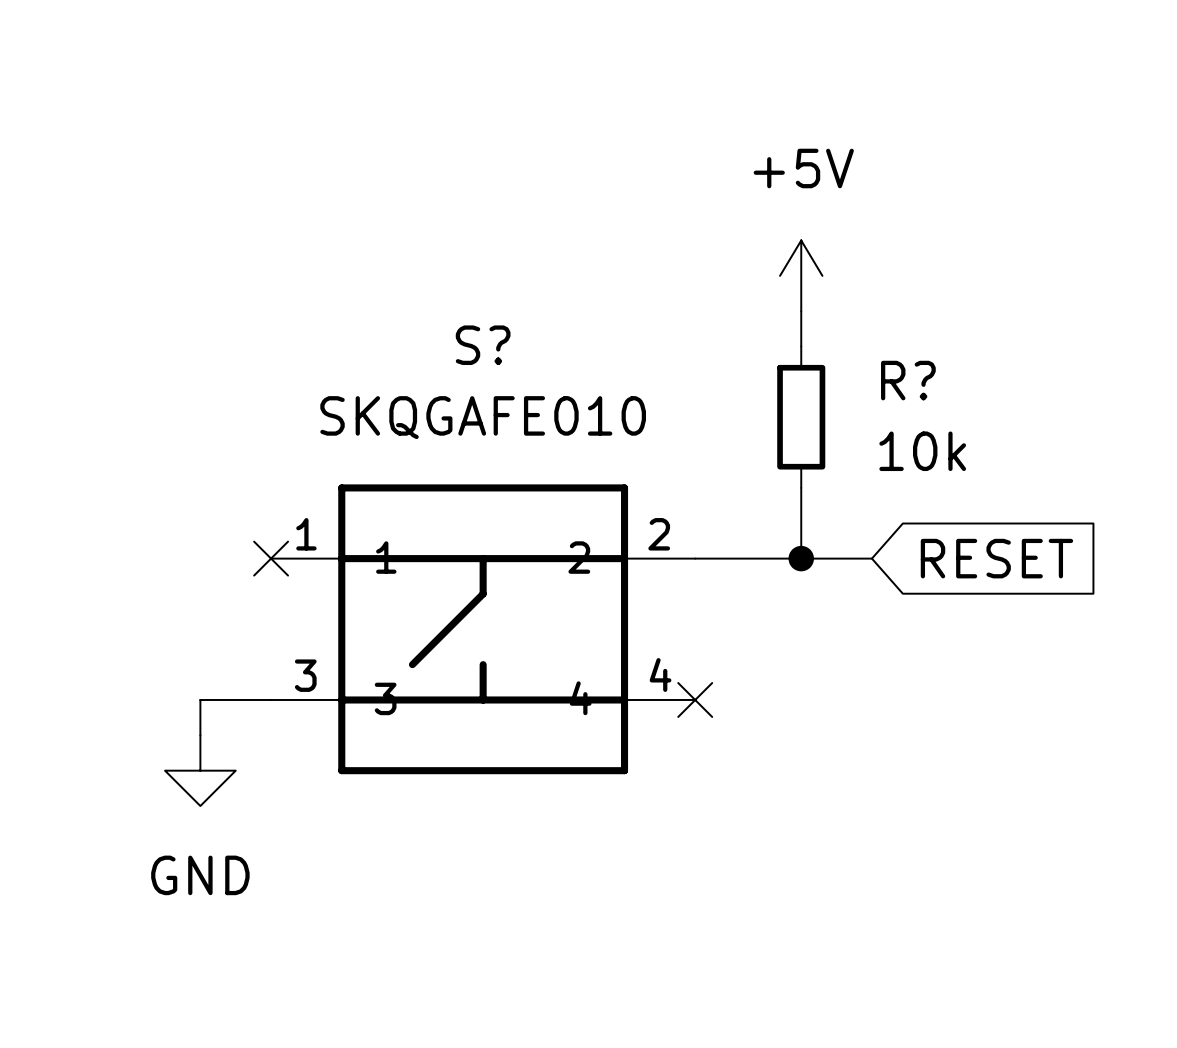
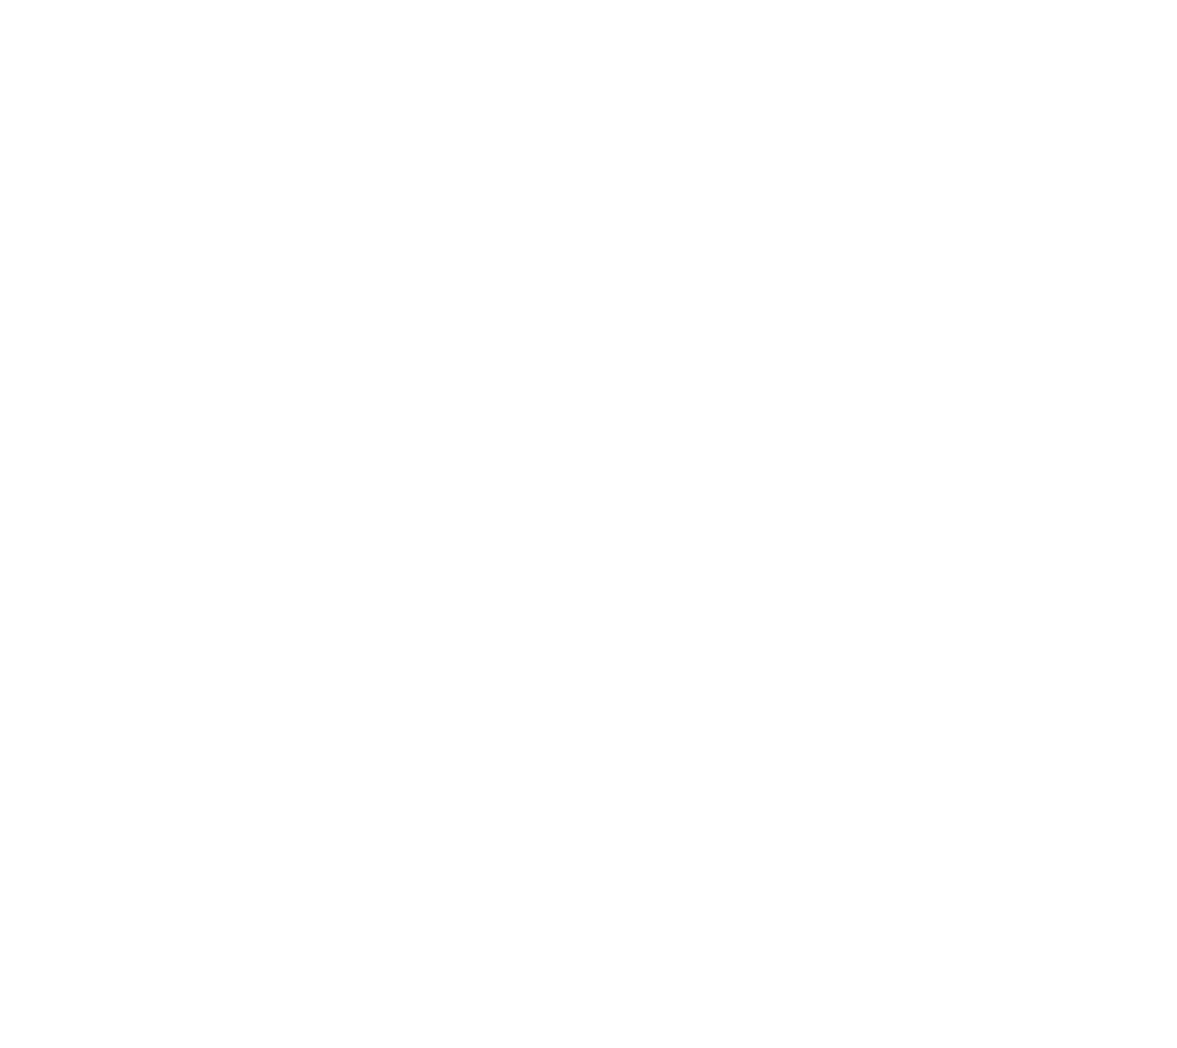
power symbol: +5V (801, 275) -> none
wire: (801, 311) (801, 346) -> none
R?: 10k (801, 417) -> none
wire: (801, 487) (801, 558) -> none
no-connect mark: (271, 558) -> none
wire: (695, 558) (871, 558) -> none
junction: (801, 558) -> none
global label: RESET (996, 558) -> none
S?: SKQGAFE010 (483, 629) -> none
wire: (271, 699) (200, 699) (200, 735) -> none
no-connect mark: (695, 699) -> none
power symbol: GND (200, 770) -> none

